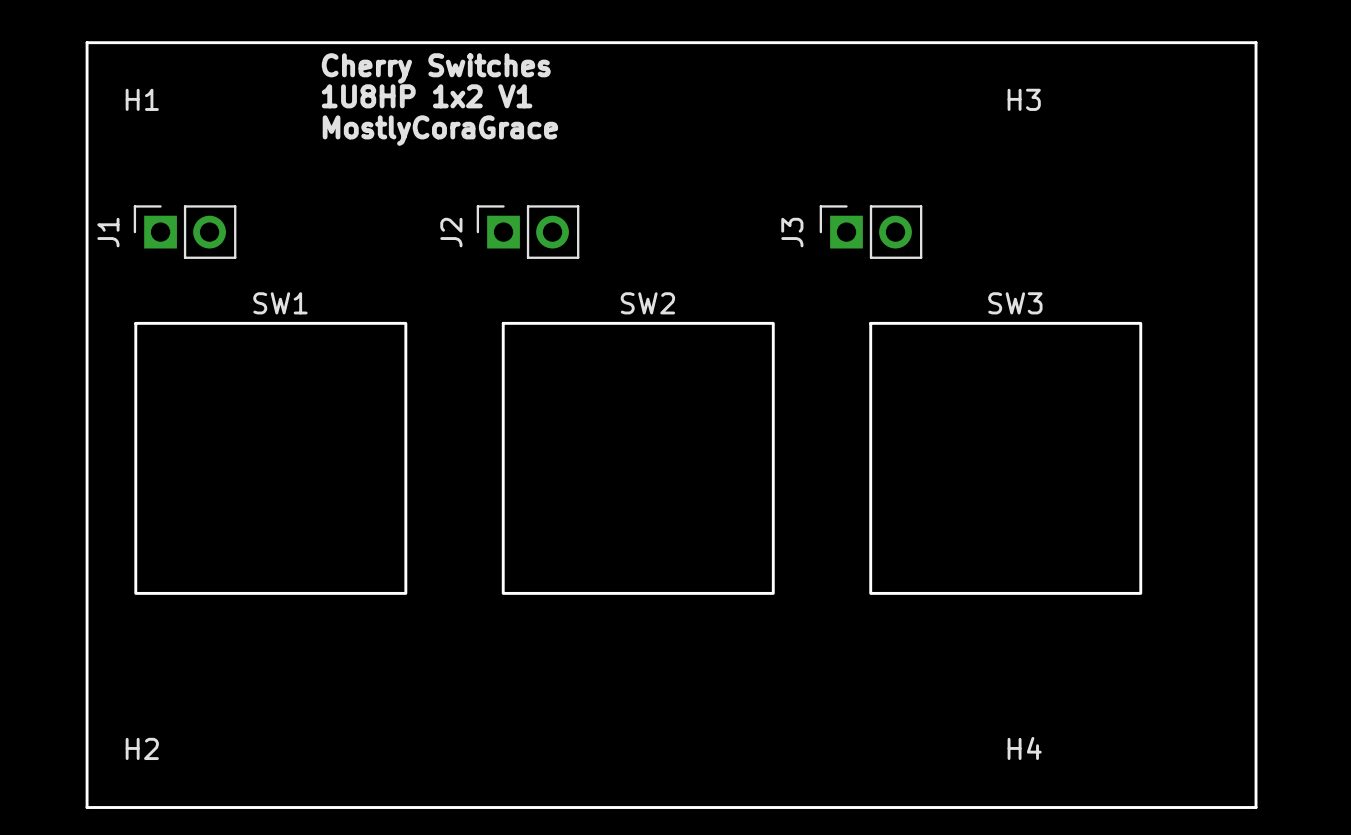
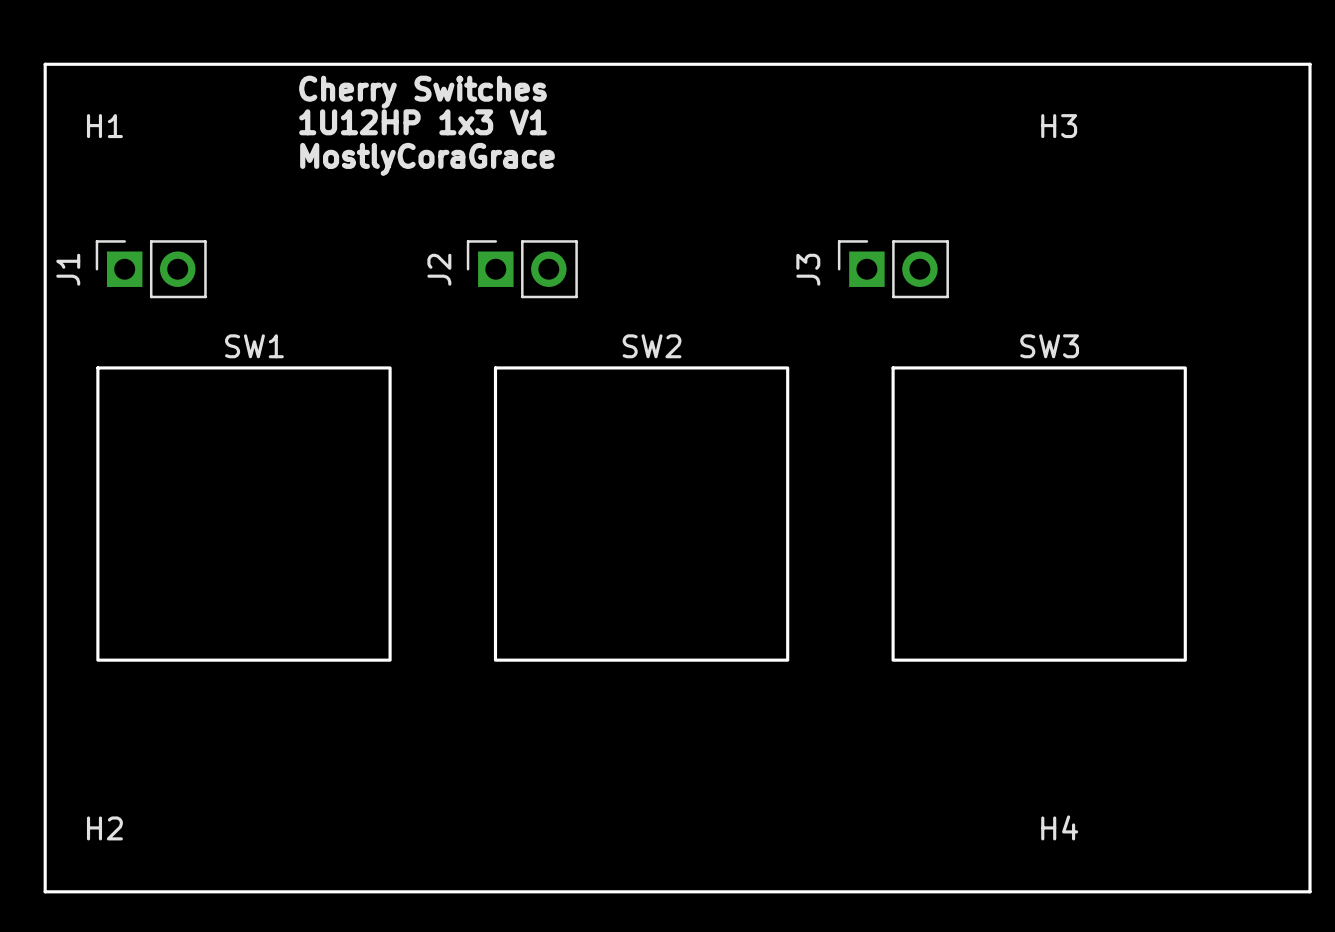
text: 1U8HP 1x2 V1 (427, 96) -> 1U12HP 1x3 V1 (423, 122)

